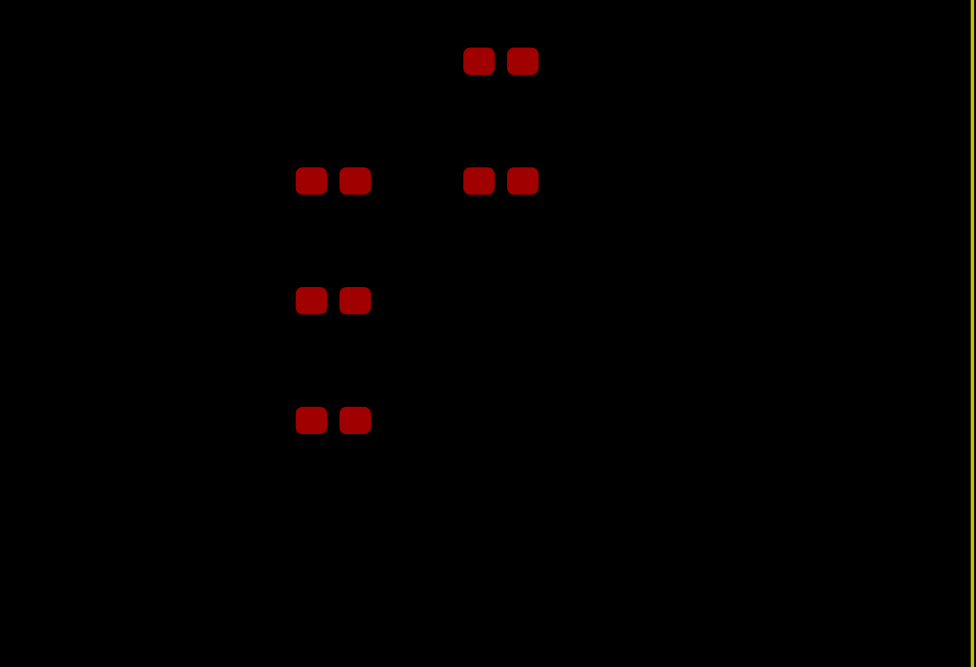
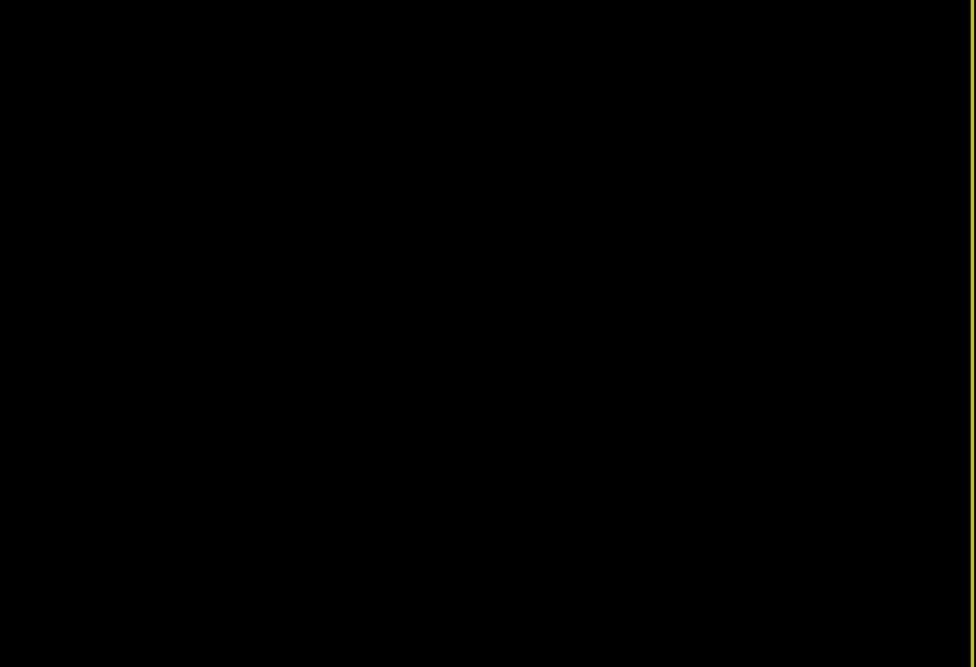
part: (500, 61) -> none
part: (333, 180) -> none
part: (500, 180) -> none
part: (333, 300) -> none
part: (333, 420) -> none

